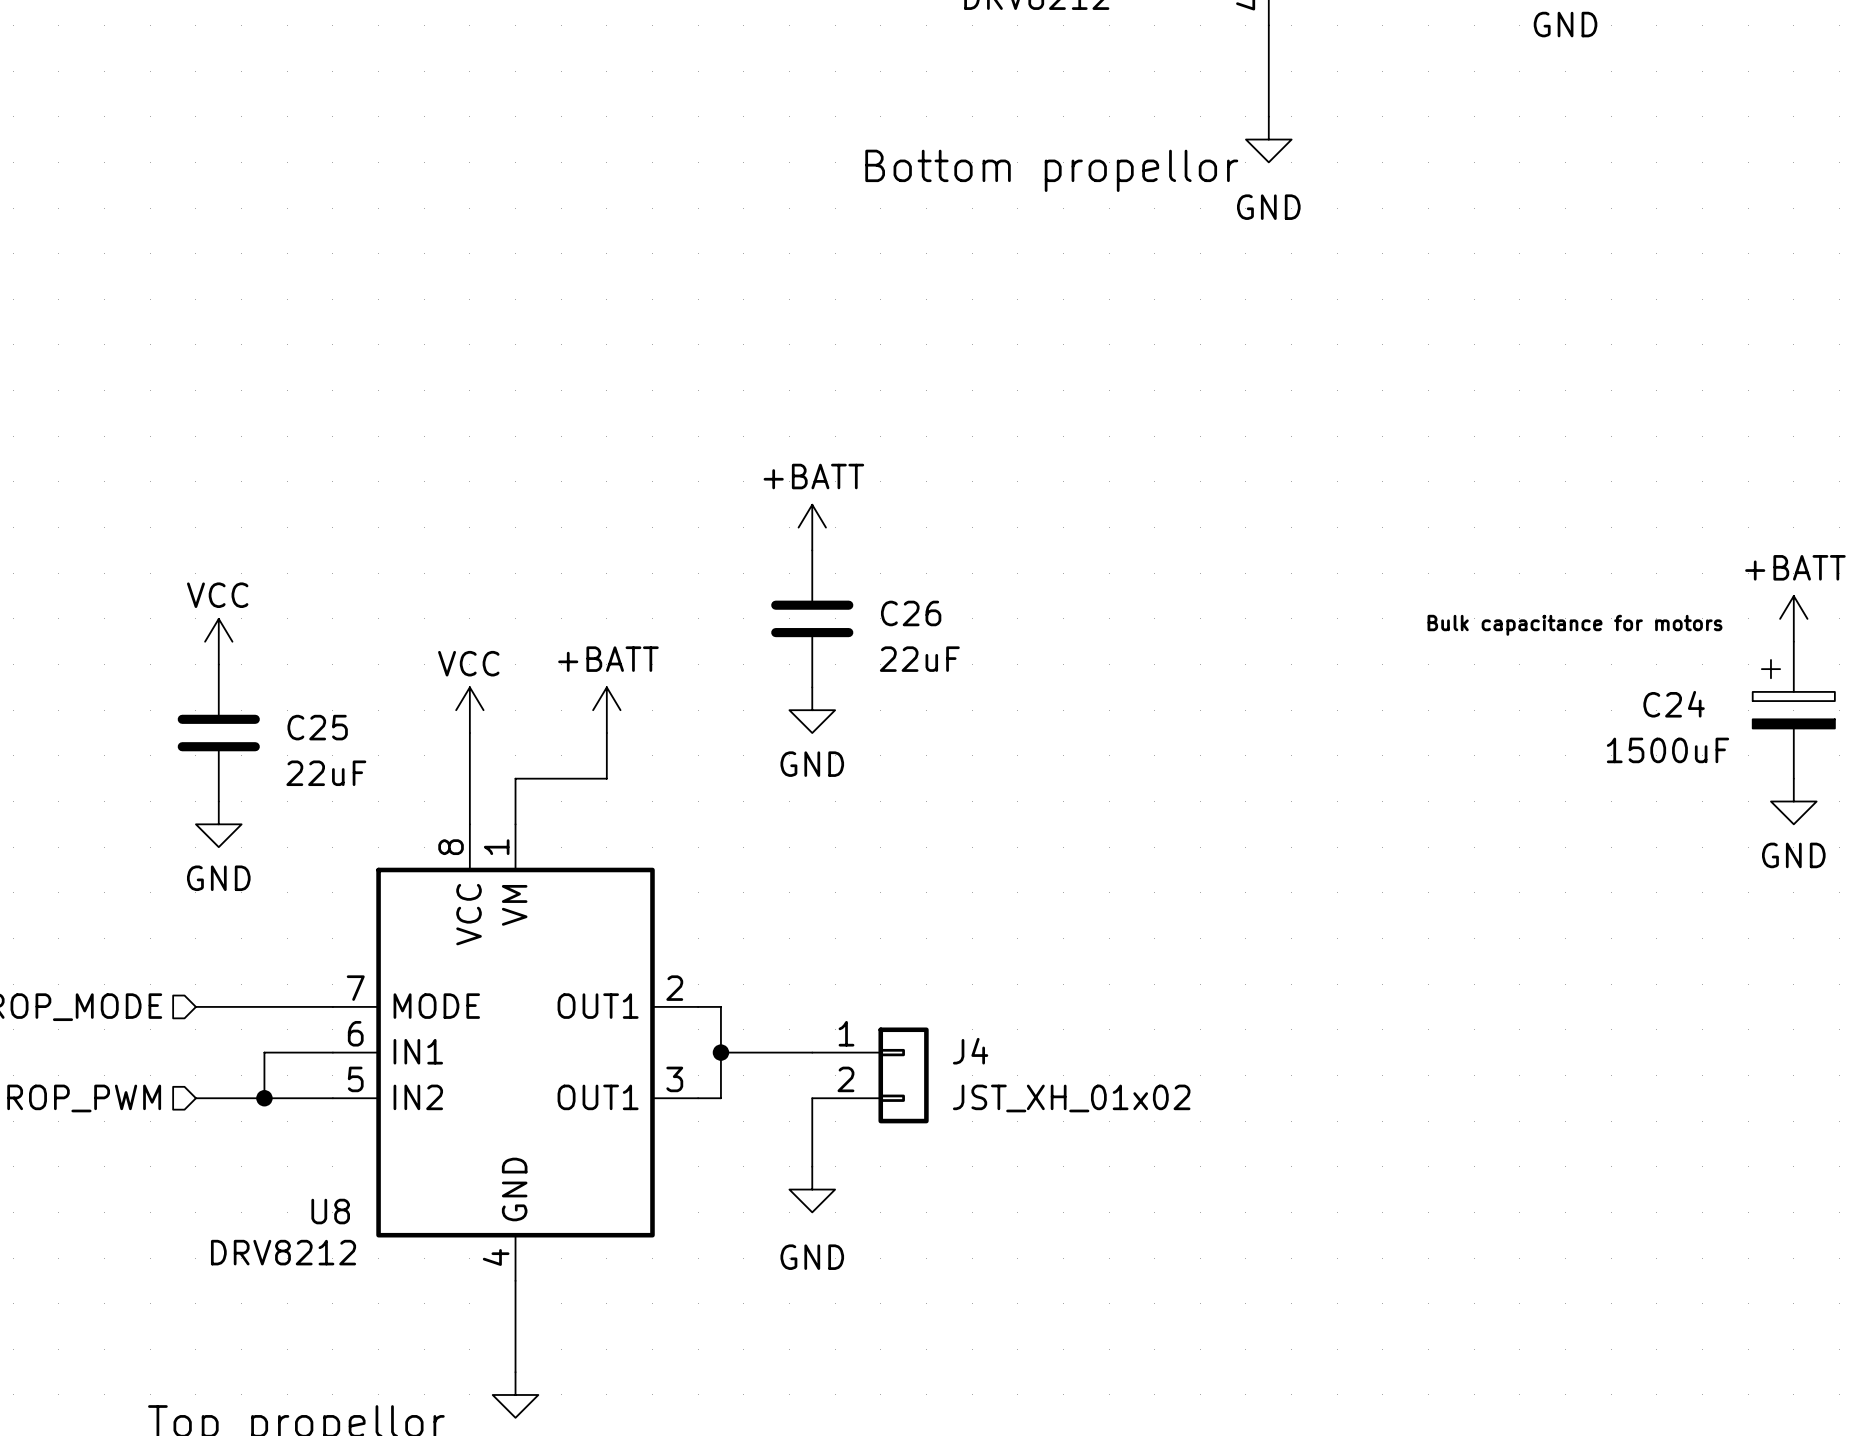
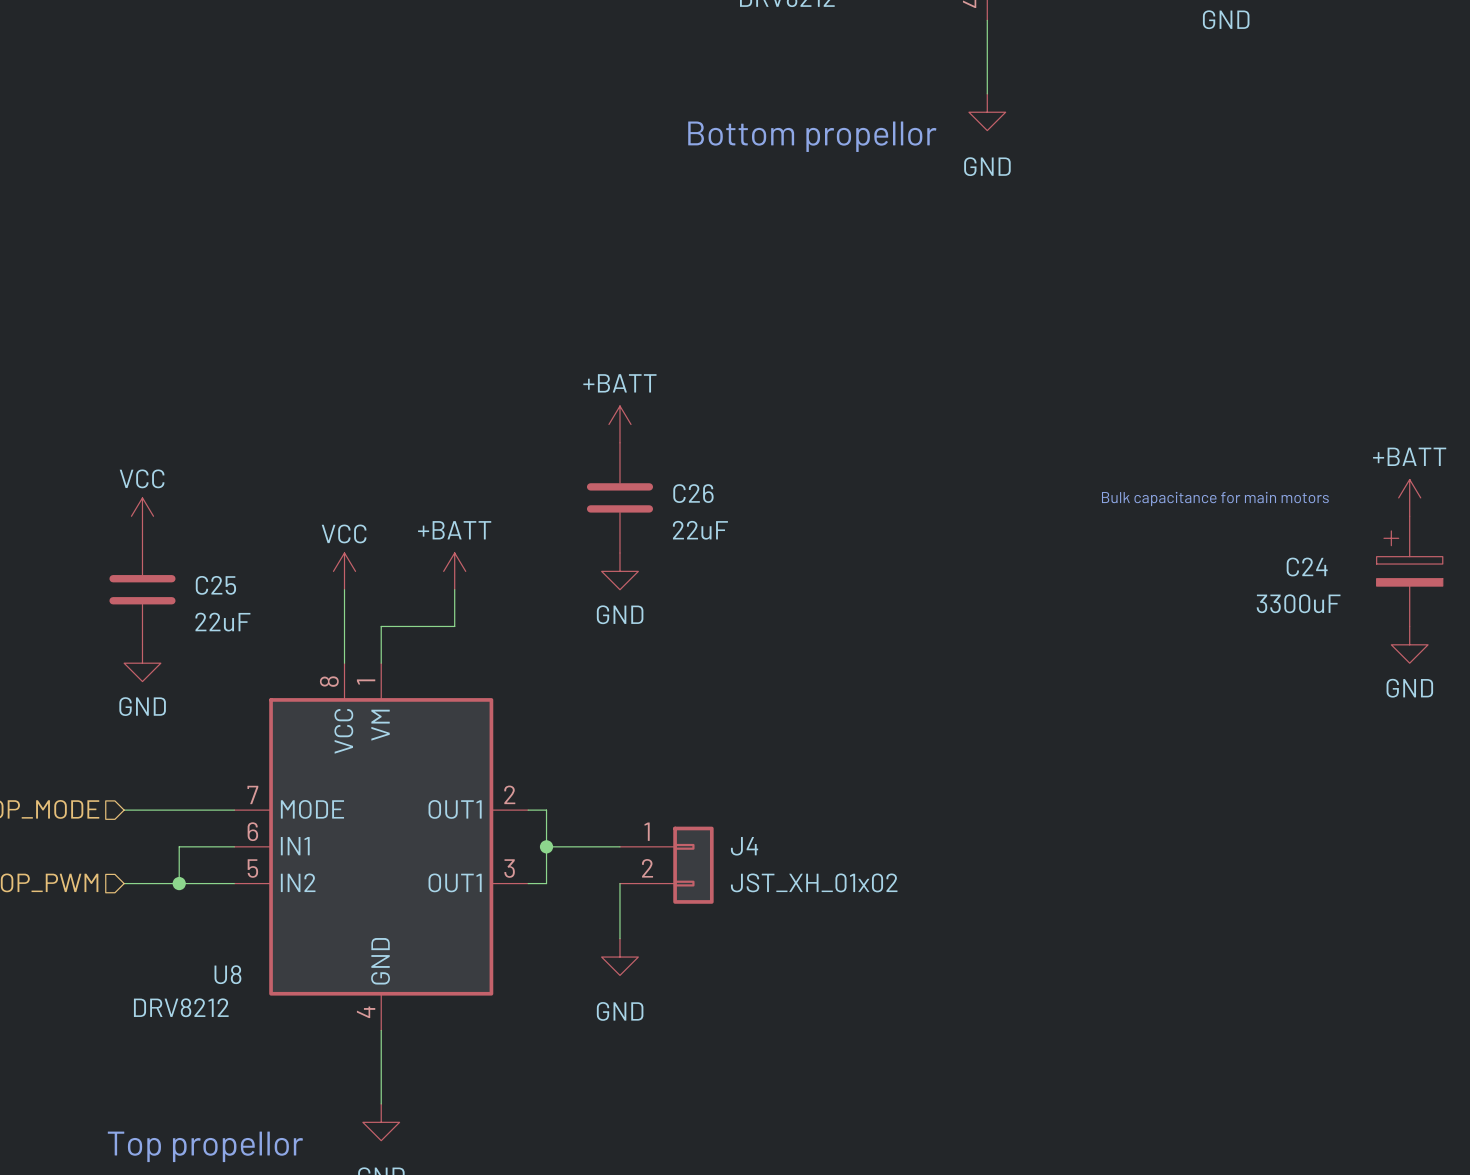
text: Bulk capacitance for motors (1575, 625) -> Bulk capacitance for main motors (1215, 499)
C24 value: 1500uF (1668, 750) -> 3300uF (1298, 603)

